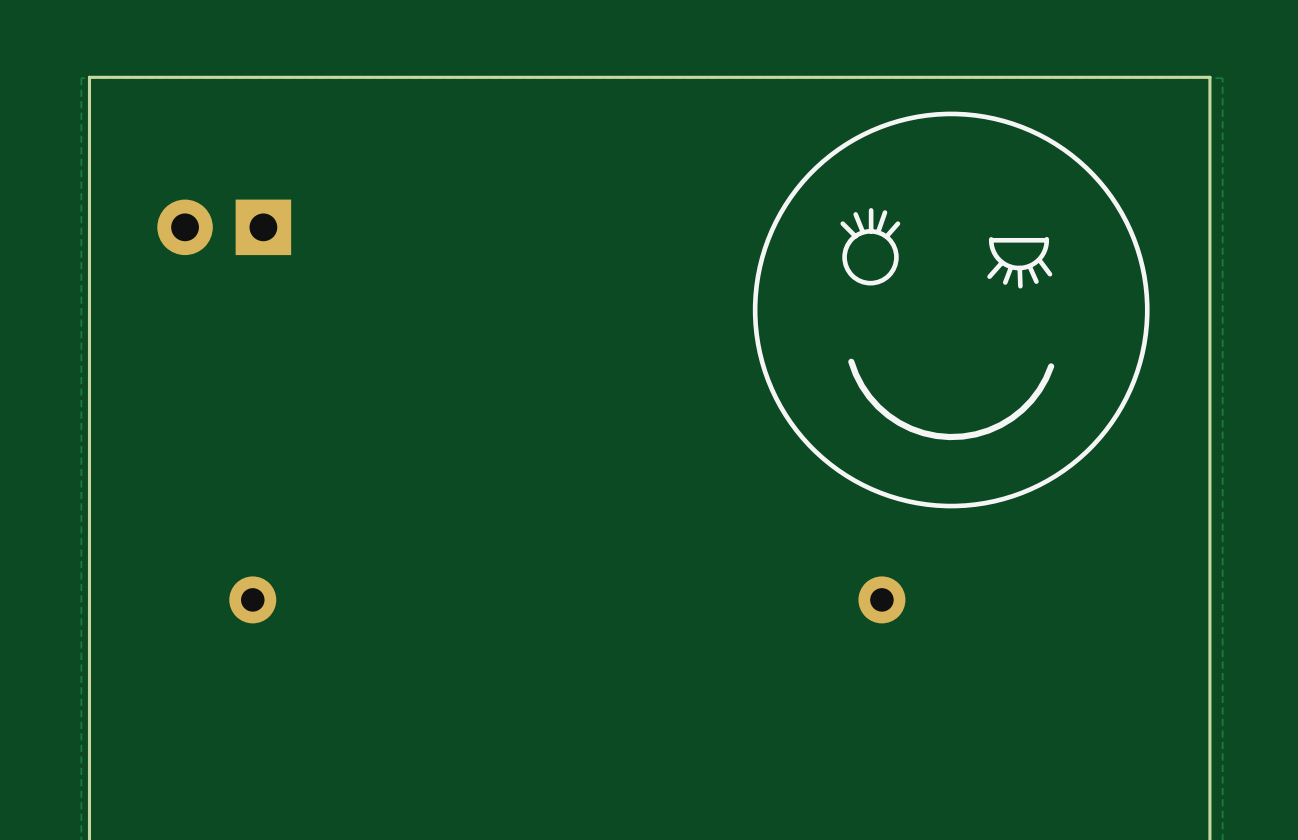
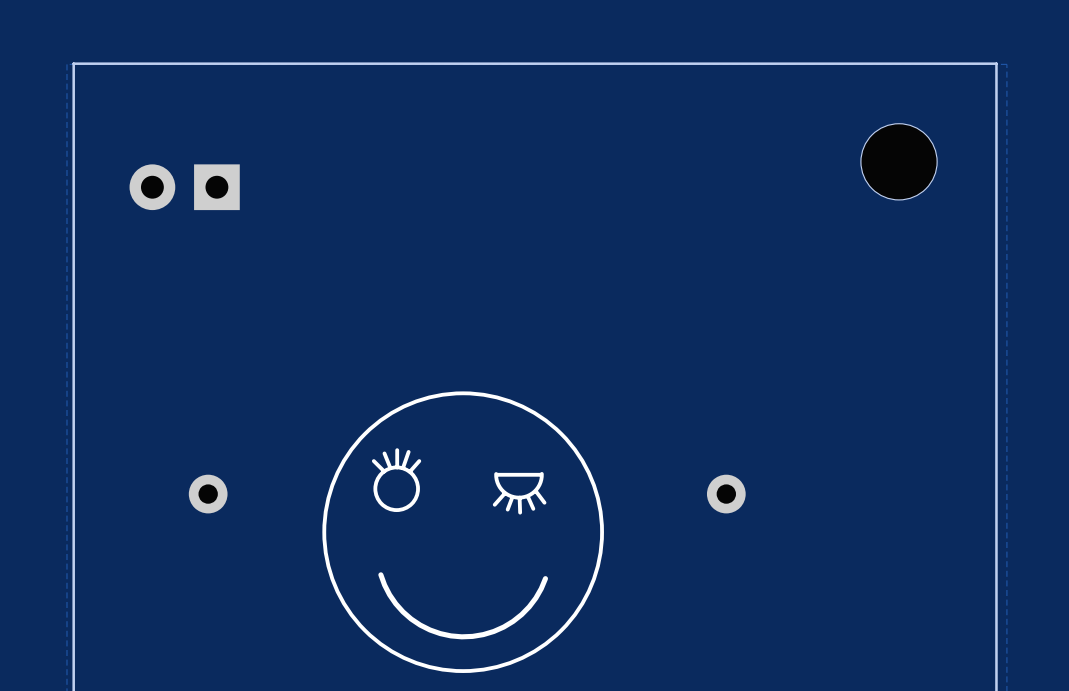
drawing: [752, 111, 1150, 509] -> none
part: none -> (899, 161)
line: (871, 210) (871, 231) -> (397, 450) (397, 467)
line: (884, 212) (878, 231) -> (408, 451) (403, 467)
line: (855, 214) (862, 231) -> (384, 453) (390, 467)
line: (842, 223) (855, 236) -> (373, 461) (384, 471)
line: (897, 223) (886, 236) -> (419, 461) (409, 471)
line: (1046, 239) (1045, 249) (1040, 258) (1032, 264) (1019, 268) (1009, 266) (997, 258) (992, 249) (991, 239) -> (541, 473) (540, 482) (536, 489) (529, 494) (519, 497) (510, 496) (503, 491) (497, 482) (496, 474)
line: (1045, 240) (992, 240) -> (540, 474) (497, 474)
drawing position: (870, 257) -> (396, 488)
line: (1039, 260) (1049, 274) -> (536, 491) (544, 502)
line: (1001, 262) (989, 276) -> (504, 493) (494, 504)
line: (1011, 267) (1005, 282) -> (512, 496) (507, 509)
line: (1029, 267) (1036, 281) -> (528, 496) (533, 508)
line: (1019, 268) (1020, 286) -> (519, 497) (520, 512)
line: (851, 361) (861, 385) (869, 396) (888, 415) (899, 422) (923, 433) (949, 437) (975, 434) (1000, 425) (1011, 418) (1031, 400) (1046, 378) (1051, 366) -> (380, 574) (395, 603) (411, 619) (440, 633) (461, 636) (493, 631) (513, 621) (529, 606) (545, 578)
drawing: none -> [322, 391, 604, 673]

